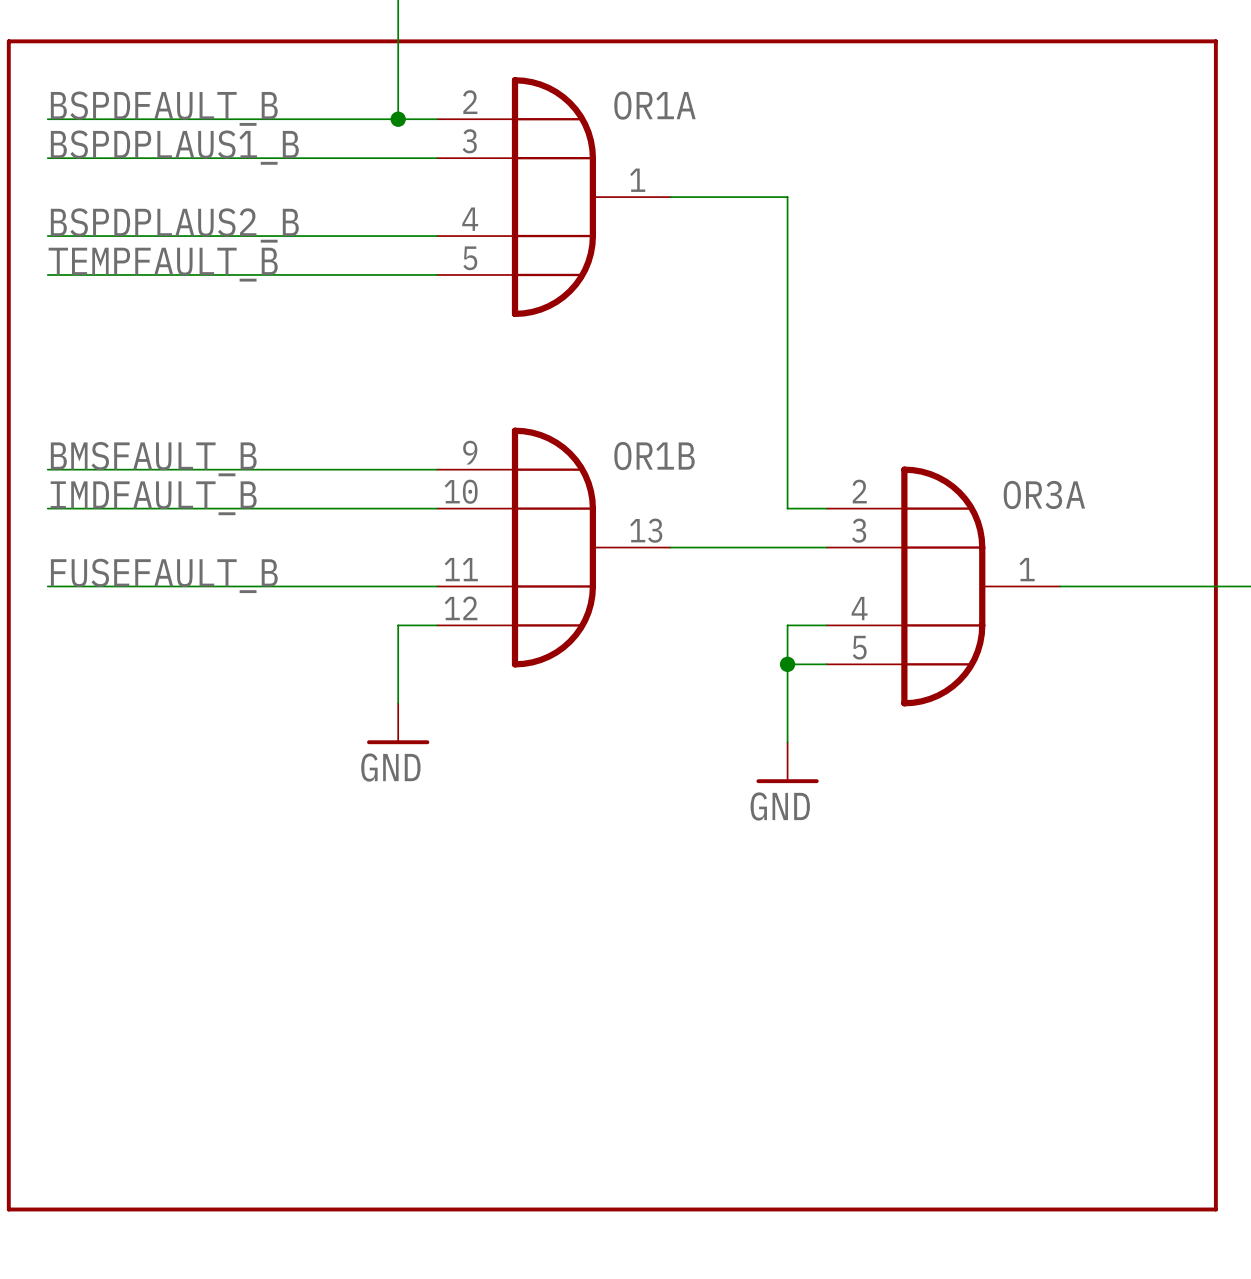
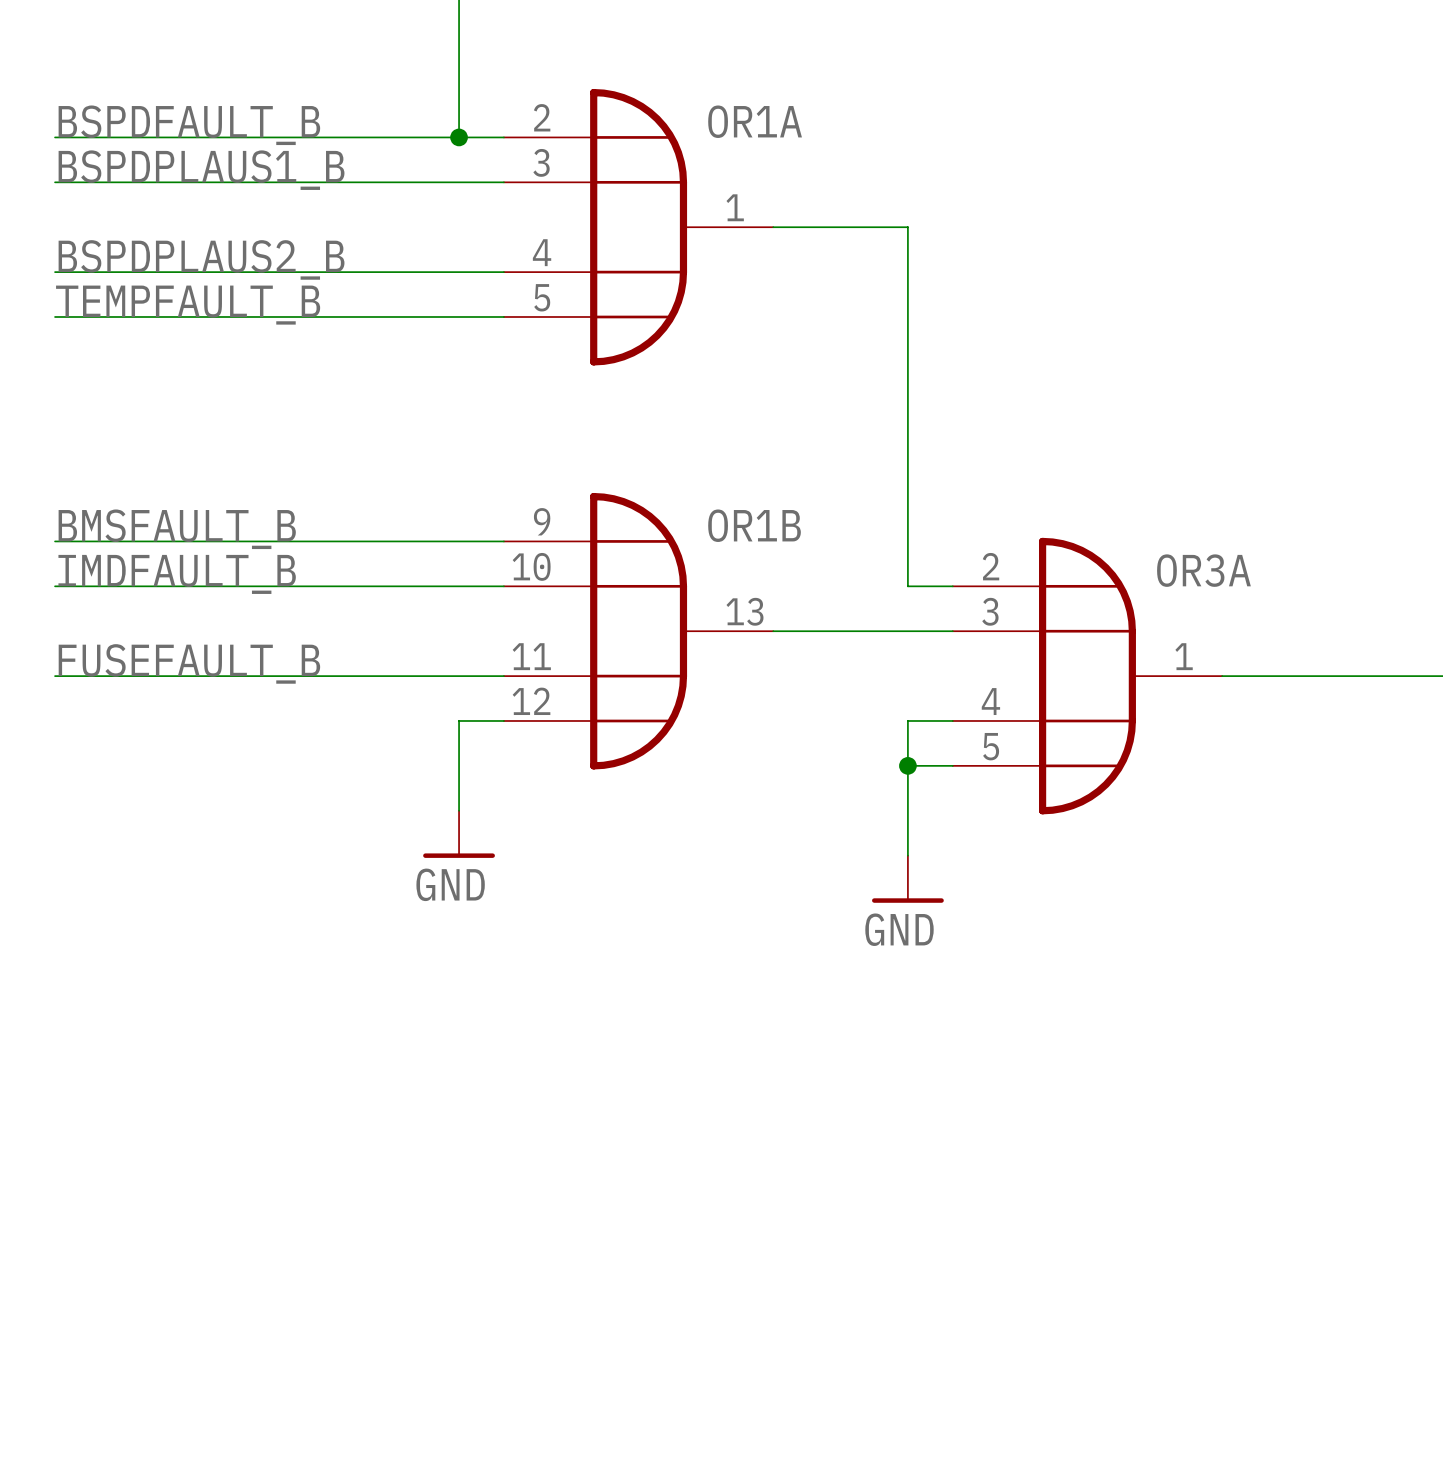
line: (8, 41) (8, 1209) (1215, 1209) (1215, 41) (8, 41) -> none

